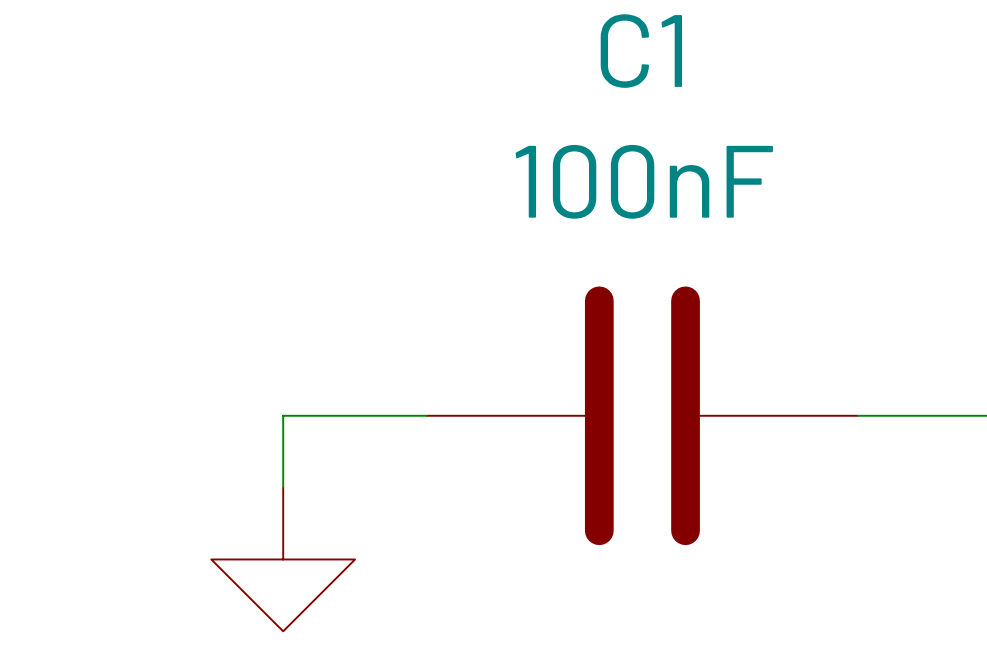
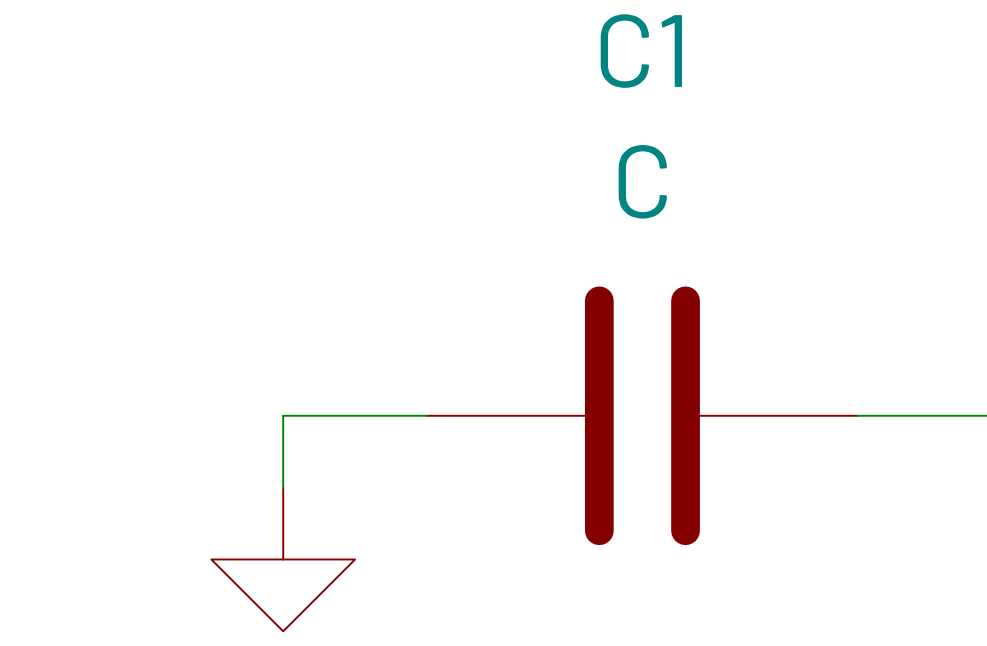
C1 value: 100nF (644, 181) -> C (642, 181)

